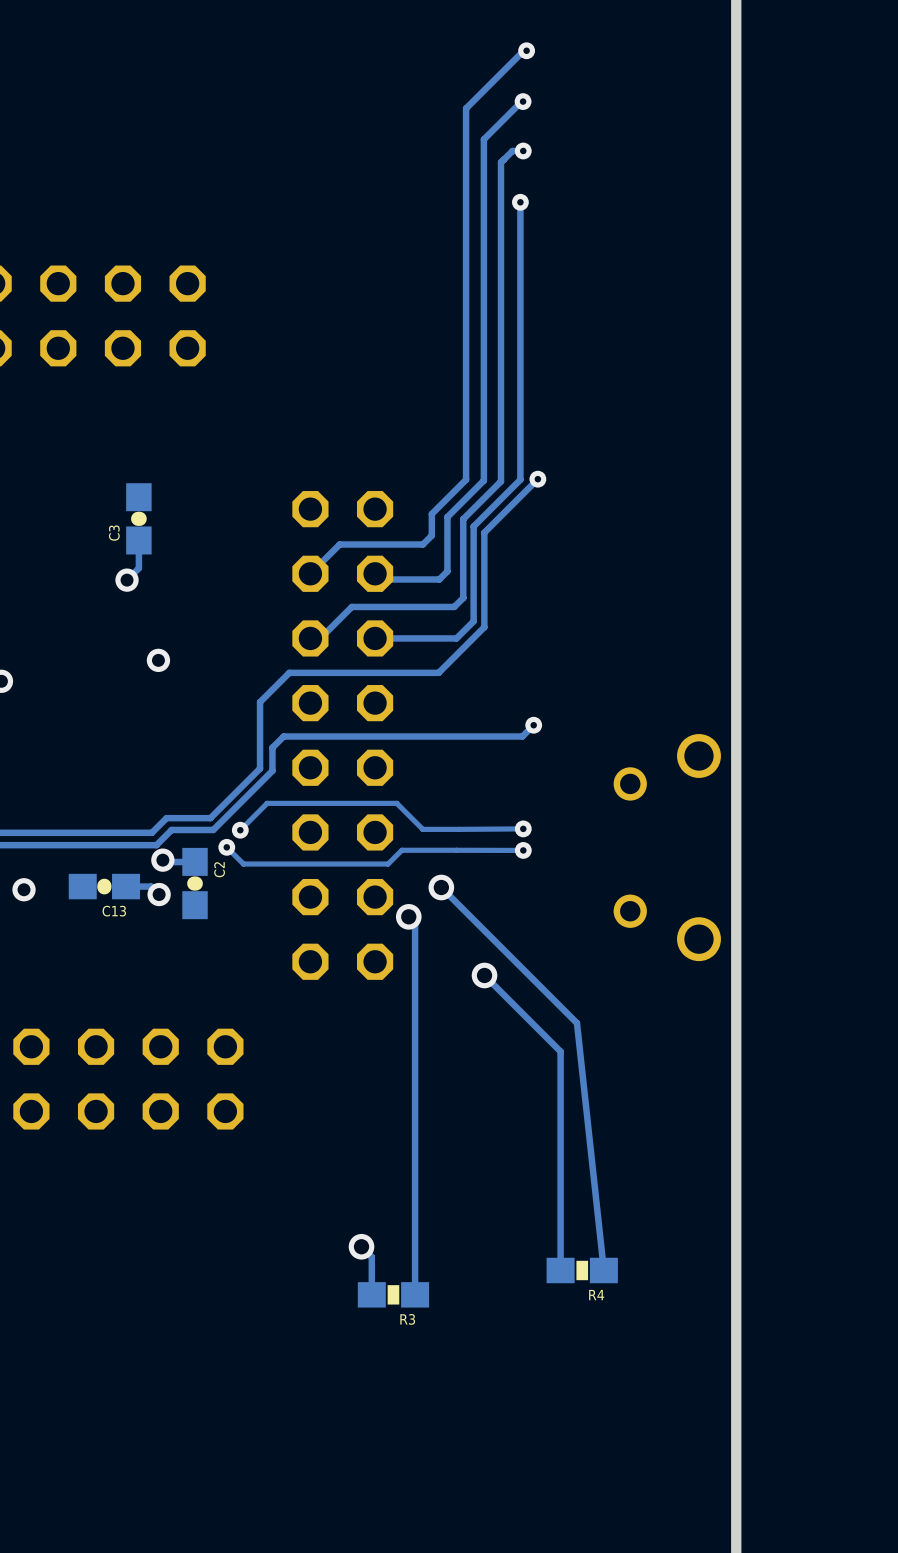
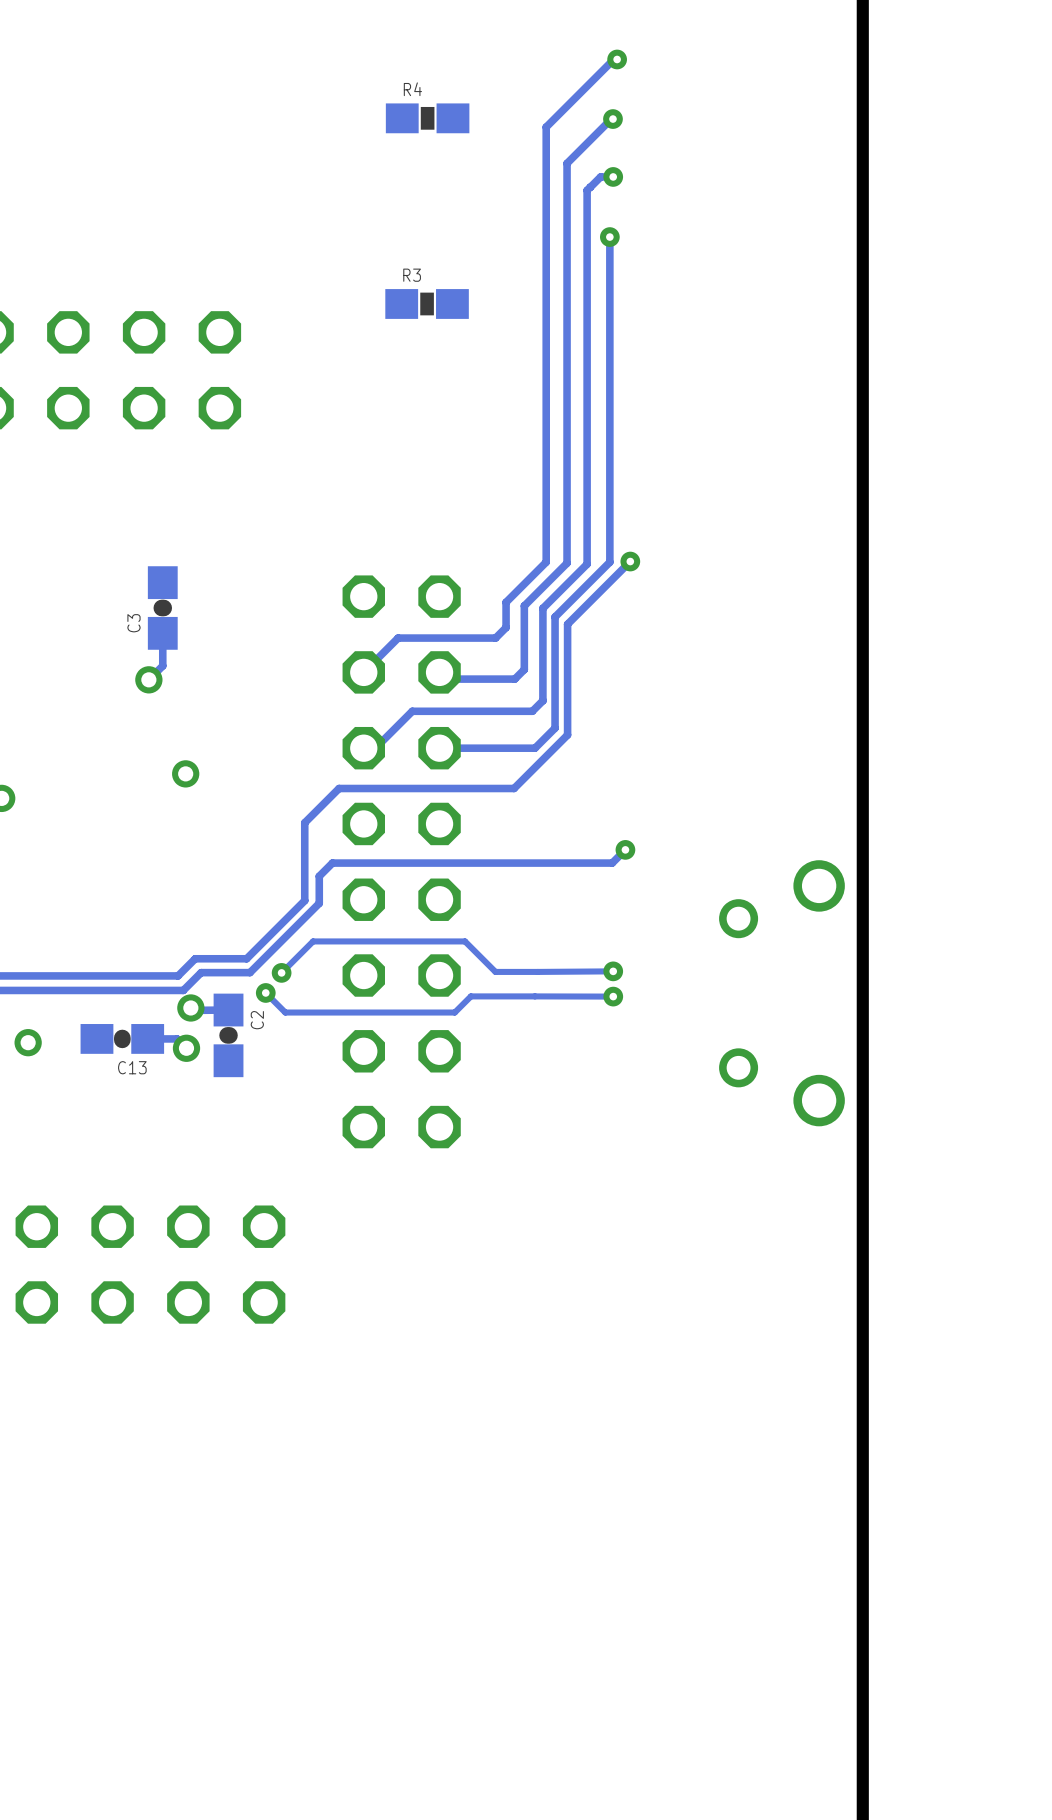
track: (441, 887) (576, 1023) (603, 1270) -> none
via: (441, 887) -> none
track: (408, 916) (415, 923) (415, 1294) -> none
via: (408, 916) -> none
track: (484, 975) (560, 1051) (560, 1270) -> none
via: (484, 975) -> none
track: (361, 1246) (371, 1257) (371, 1294) -> none
via: (361, 1246) -> none
R4 position: (582, 1270) -> (427, 118)
R3 position: (393, 1294) -> (427, 303)
R4 name position: R4 (596, 1295) -> R4 (412, 89)
R3 name position: R3 (407, 1319) -> R3 (412, 275)

